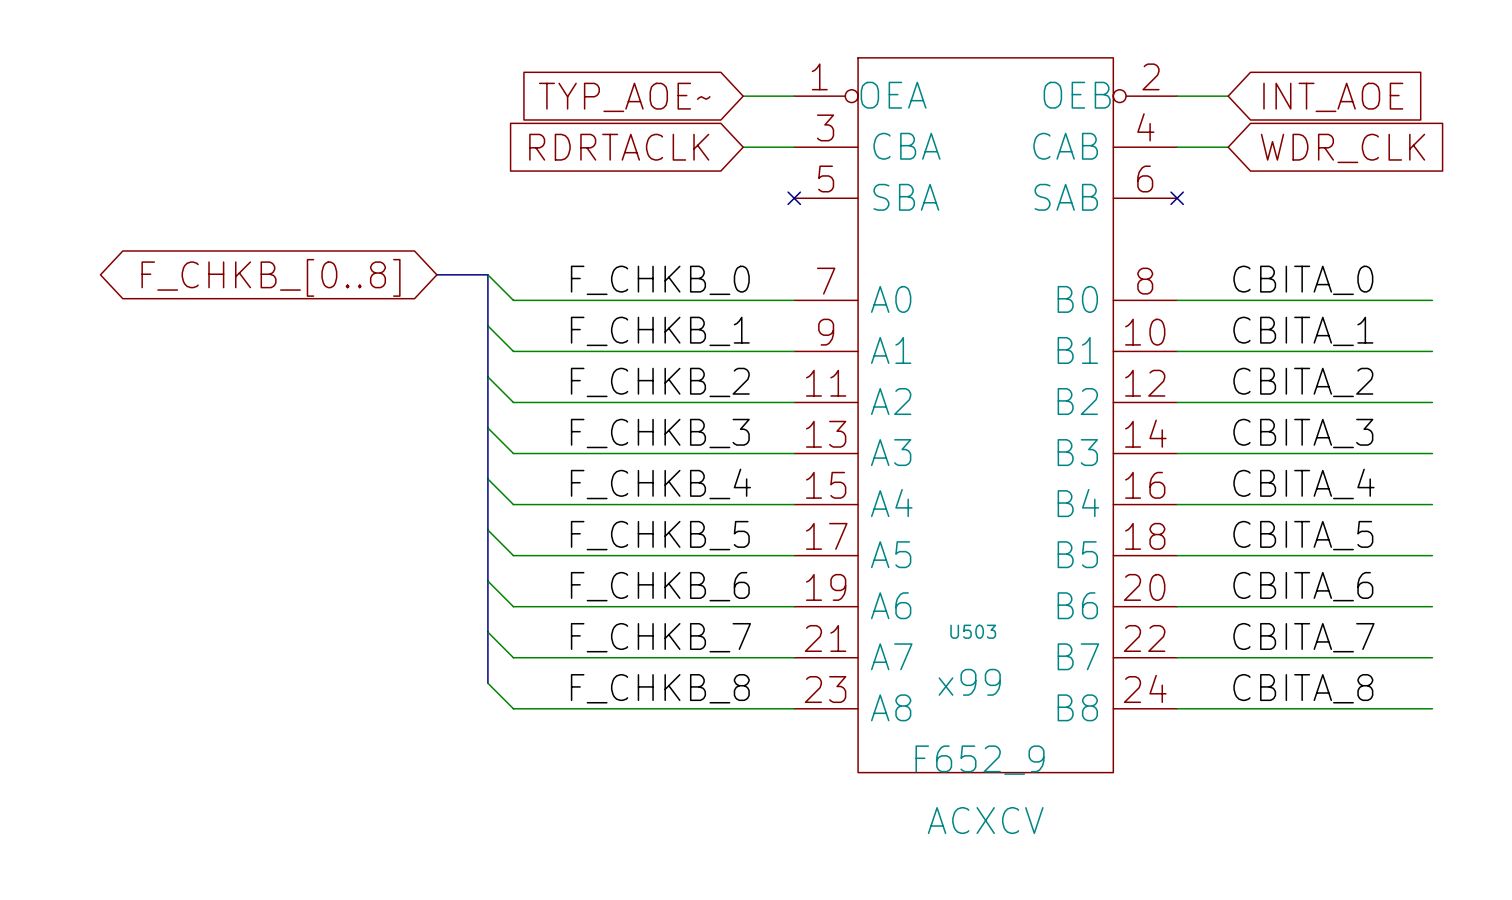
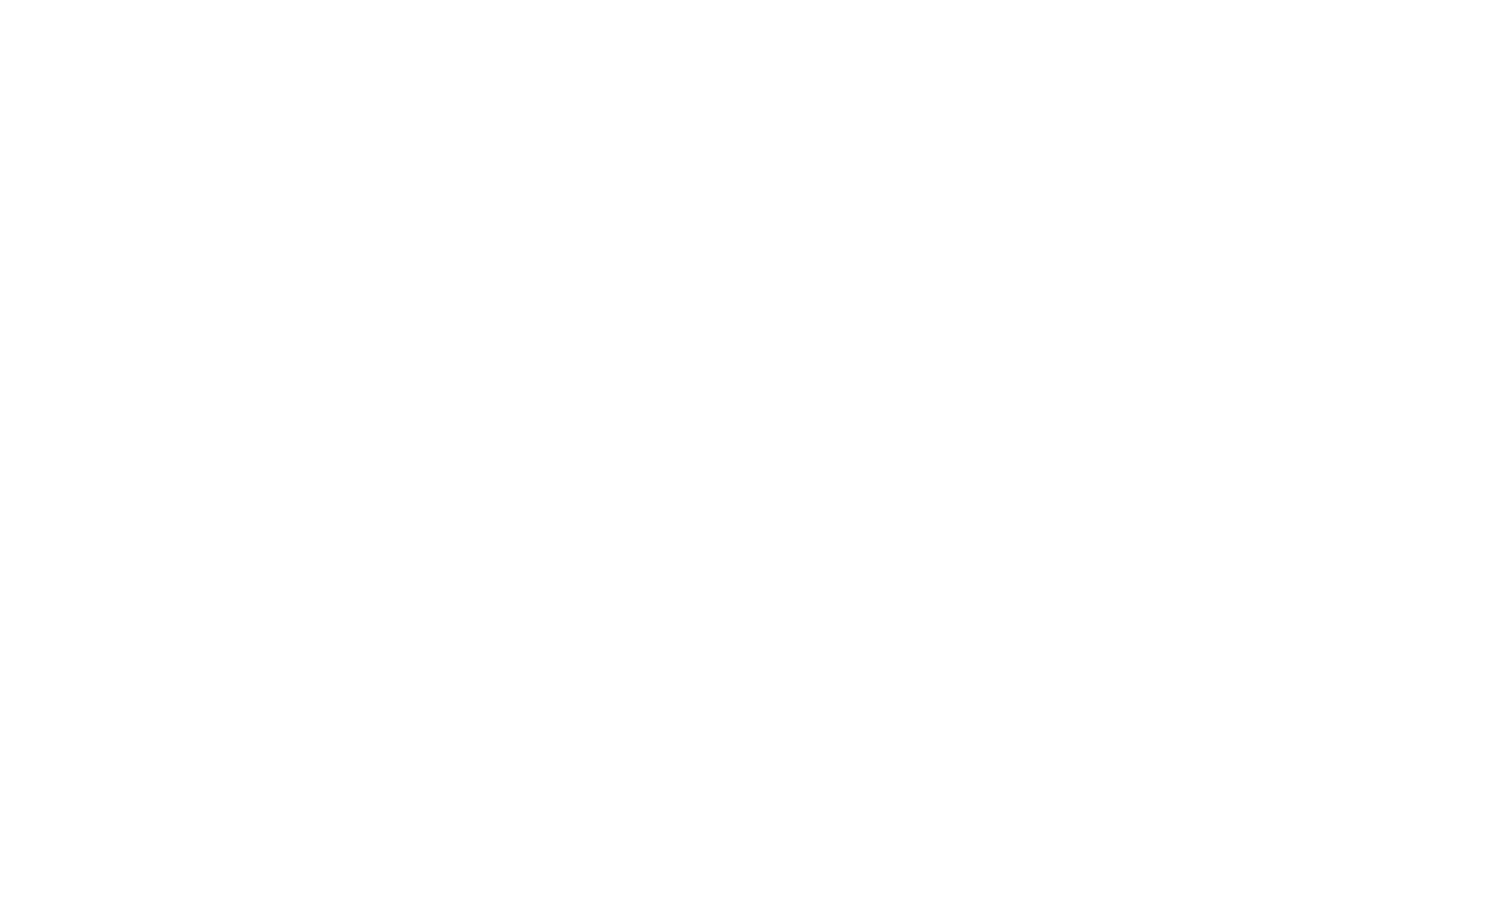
wire: (743, 96) (794, 96) -> none
wire: (1177, 96) (1228, 96) -> none
global label: TYP_AOE~ (624, 97) -> none
global label: INT_AOE (1333, 97) -> none
global label: RDRTACLK (619, 147) -> none
wire: (743, 147) (794, 147) -> none
wire: (1177, 147) (1228, 147) -> none
global label: WDR_CLK (1343, 148) -> none
no-connect mark: (794, 198) -> none
no-connect mark: (1177, 198) -> none
bus: (436, 274) (487, 274) (487, 683) -> none
wire: (487, 274) (513, 300) (794, 300) -> none
global label: F_CHKB_[0..8] (271, 277) -> none
label: F_CHKB_0 (660, 280) -> none
label: CBITA_0 (1303, 280) -> none
wire: (1177, 300) (1432, 300) -> none
wire: (487, 325) (513, 351) (794, 351) -> none
label: F_CHKB_1 (660, 331) -> none
label: CBITA_1 (1303, 331) -> none
wire: (1177, 351) (1432, 351) -> none
wire: (487, 376) (513, 402) (794, 402) -> none
label: F_CHKB_2 (660, 382) -> none
label: CBITA_2 (1303, 382) -> none
wire: (1177, 402) (1432, 402) -> none
U503: F652_9 (985, 415) -> none
wire: (487, 428) (513, 453) (794, 453) -> none
label: F_CHKB_3 (660, 433) -> none
label: CBITA_3 (1303, 433) -> none
wire: (1177, 453) (1432, 453) -> none
wire: (487, 479) (513, 504) (794, 504) -> none
label: F_CHKB_4 (660, 483) -> none
label: CBITA_4 (1303, 483) -> none
wire: (1177, 504) (1432, 504) -> none
wire: (487, 530) (513, 555) (794, 555) -> none
label: F_CHKB_5 (660, 535) -> none
label: CBITA_5 (1303, 535) -> none
wire: (1177, 555) (1432, 555) -> none
wire: (487, 581) (513, 606) (794, 606) -> none
label: F_CHKB_6 (660, 586) -> none
label: CBITA_6 (1303, 586) -> none
wire: (1177, 606) (1432, 606) -> none
wire: (487, 632) (513, 657) (794, 657) -> none
label: F_CHKB_7 (660, 637) -> none
label: CBITA_7 (1303, 637) -> none
wire: (1177, 657) (1432, 657) -> none
wire: (487, 683) (513, 708) (794, 708) -> none
label: F_CHKB_8 (660, 688) -> none
label: CBITA_8 (1303, 688) -> none
wire: (1177, 708) (1432, 708) -> none

